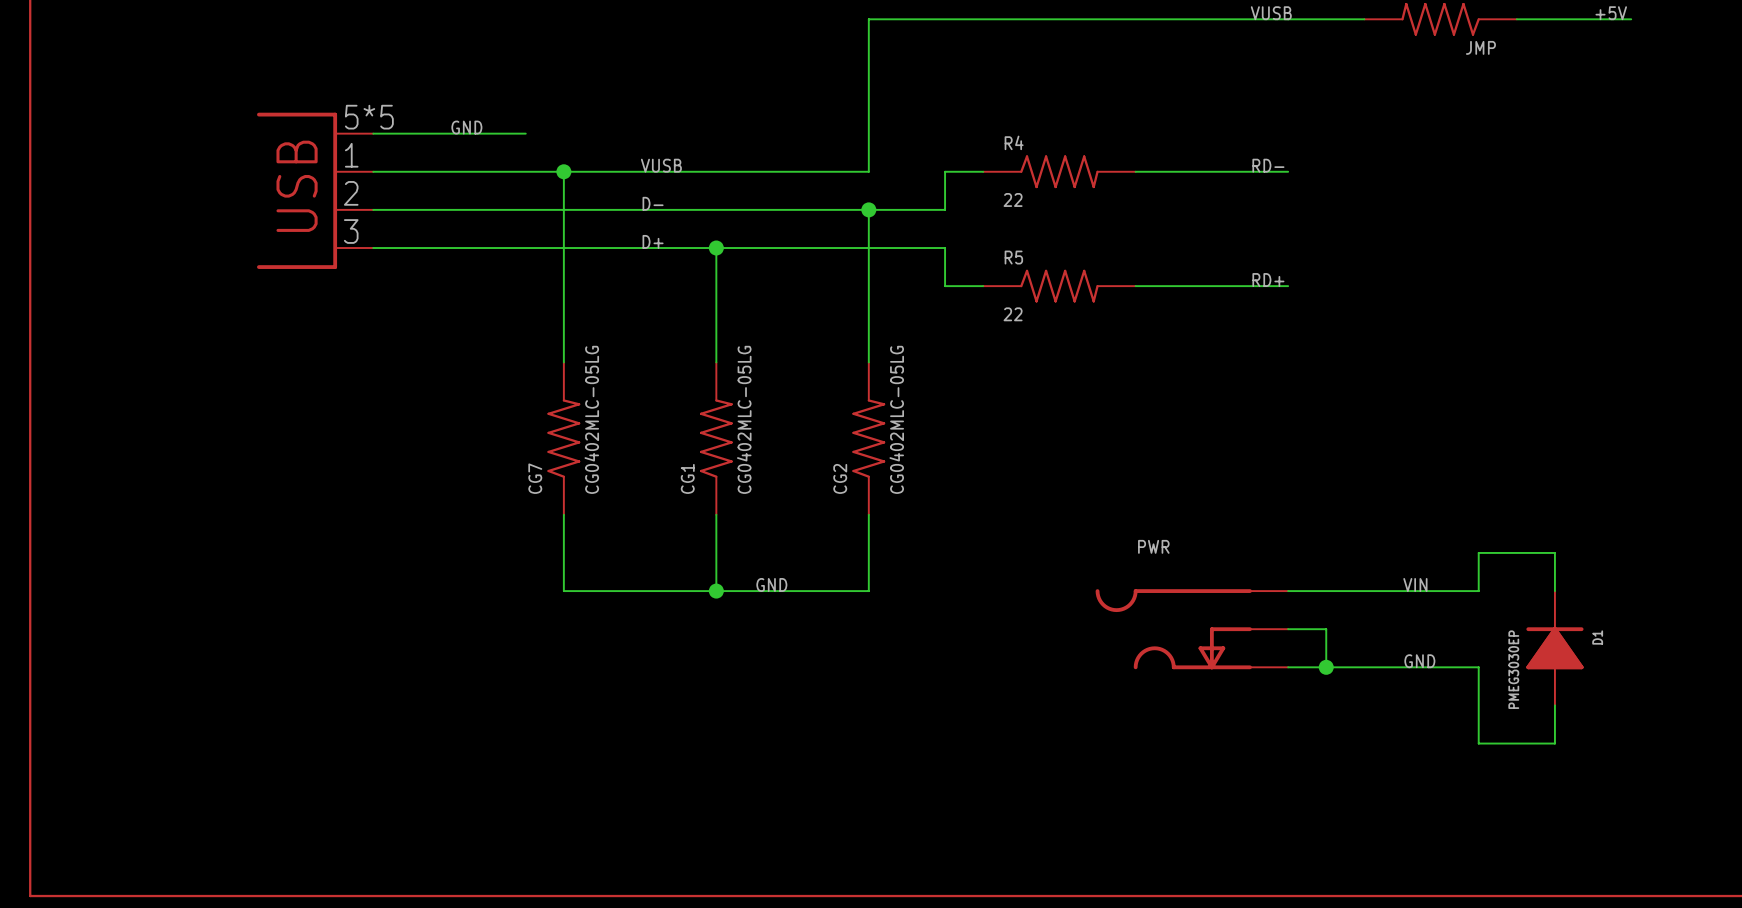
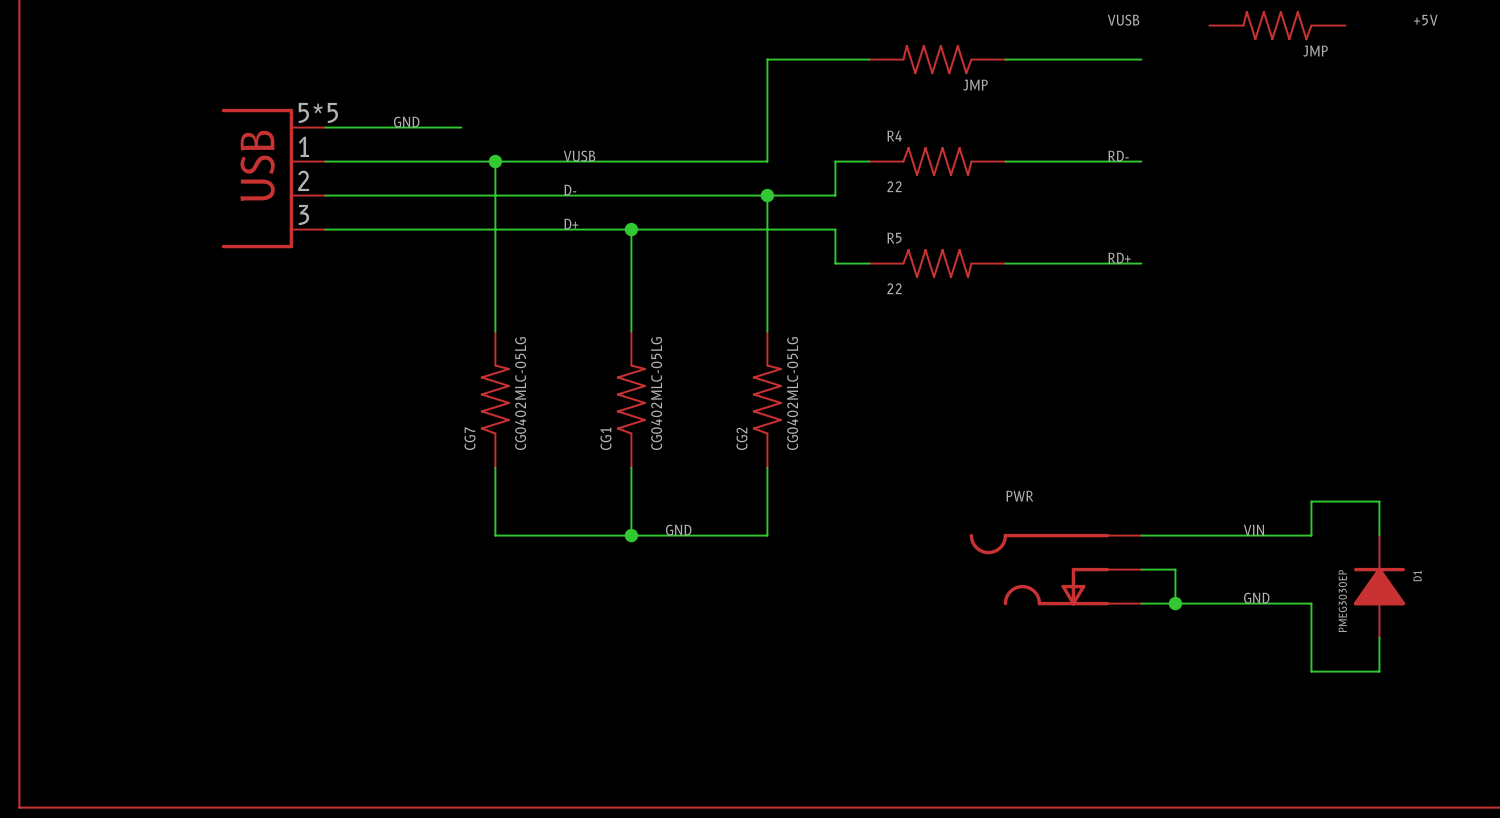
wire: (1364, 19) (868, 19) (868, 57) -> (869, 59) (767, 59)
wire: (1516, 19) (1631, 19) -> none
JMP: none -> (937, 59)
wire: none -> (1005, 59) (1141, 59)

